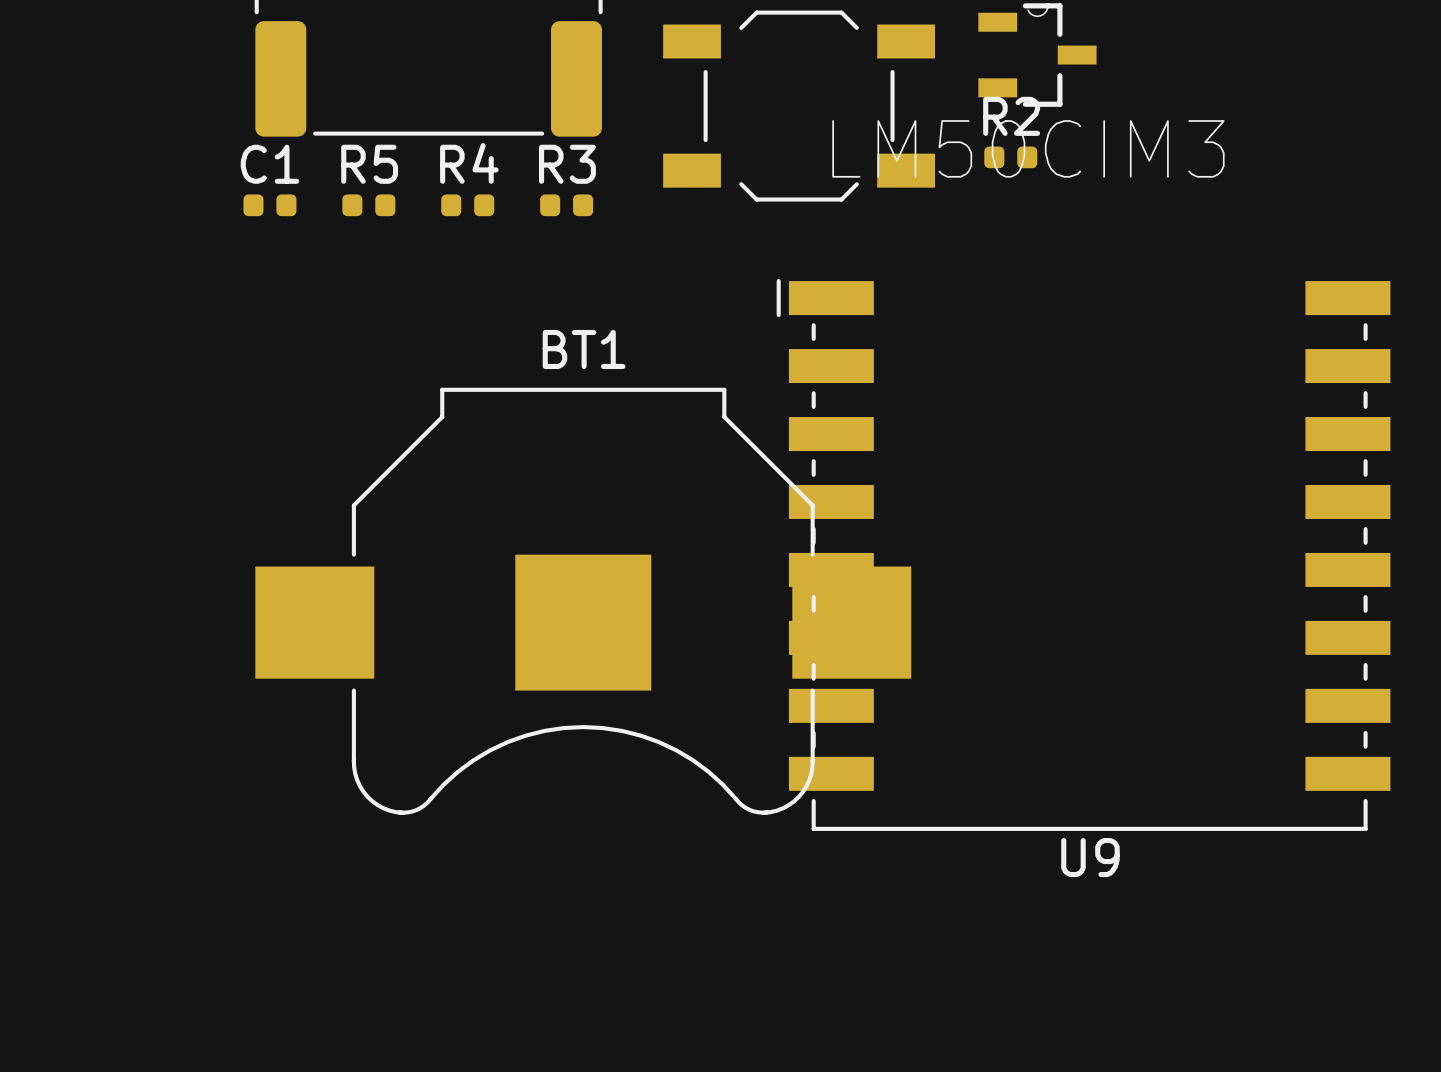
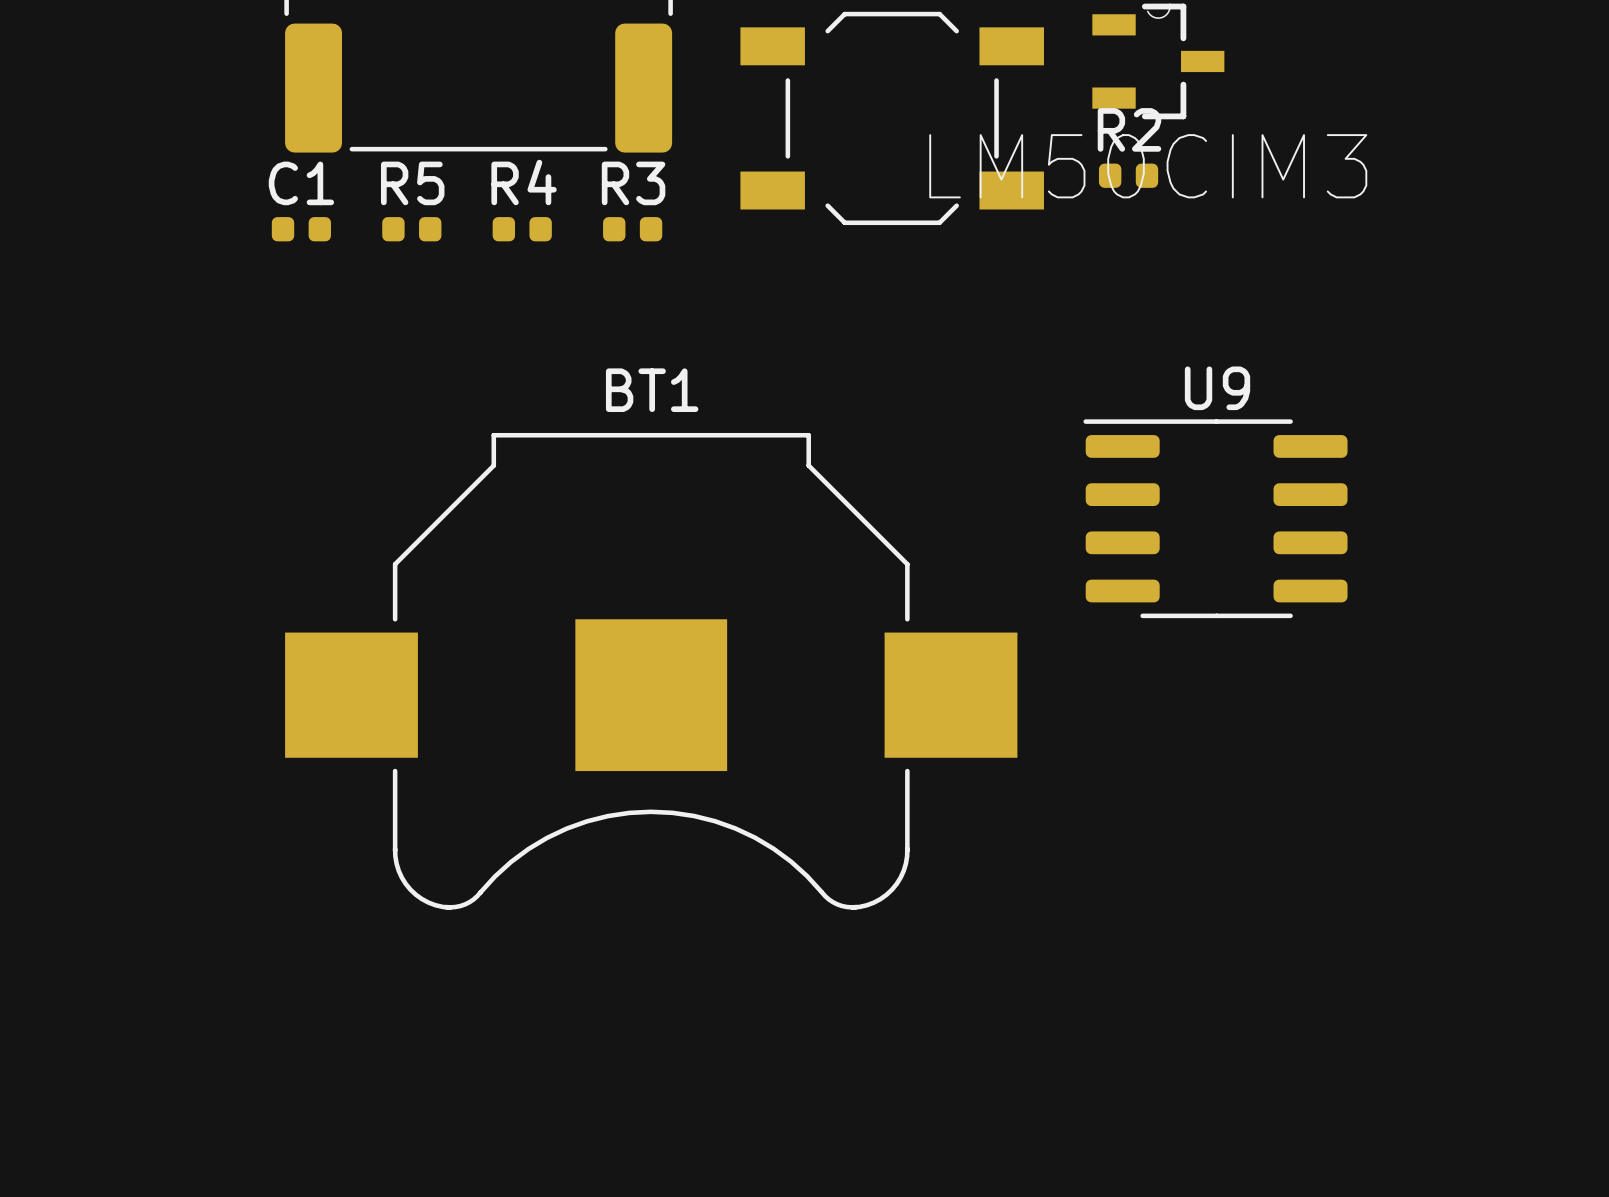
U9 footprint: [776, 279, 1391, 831] -> [1083, 419, 1348, 619]
U9 name position: U9 (1090, 857) -> U9 (1217, 388)

